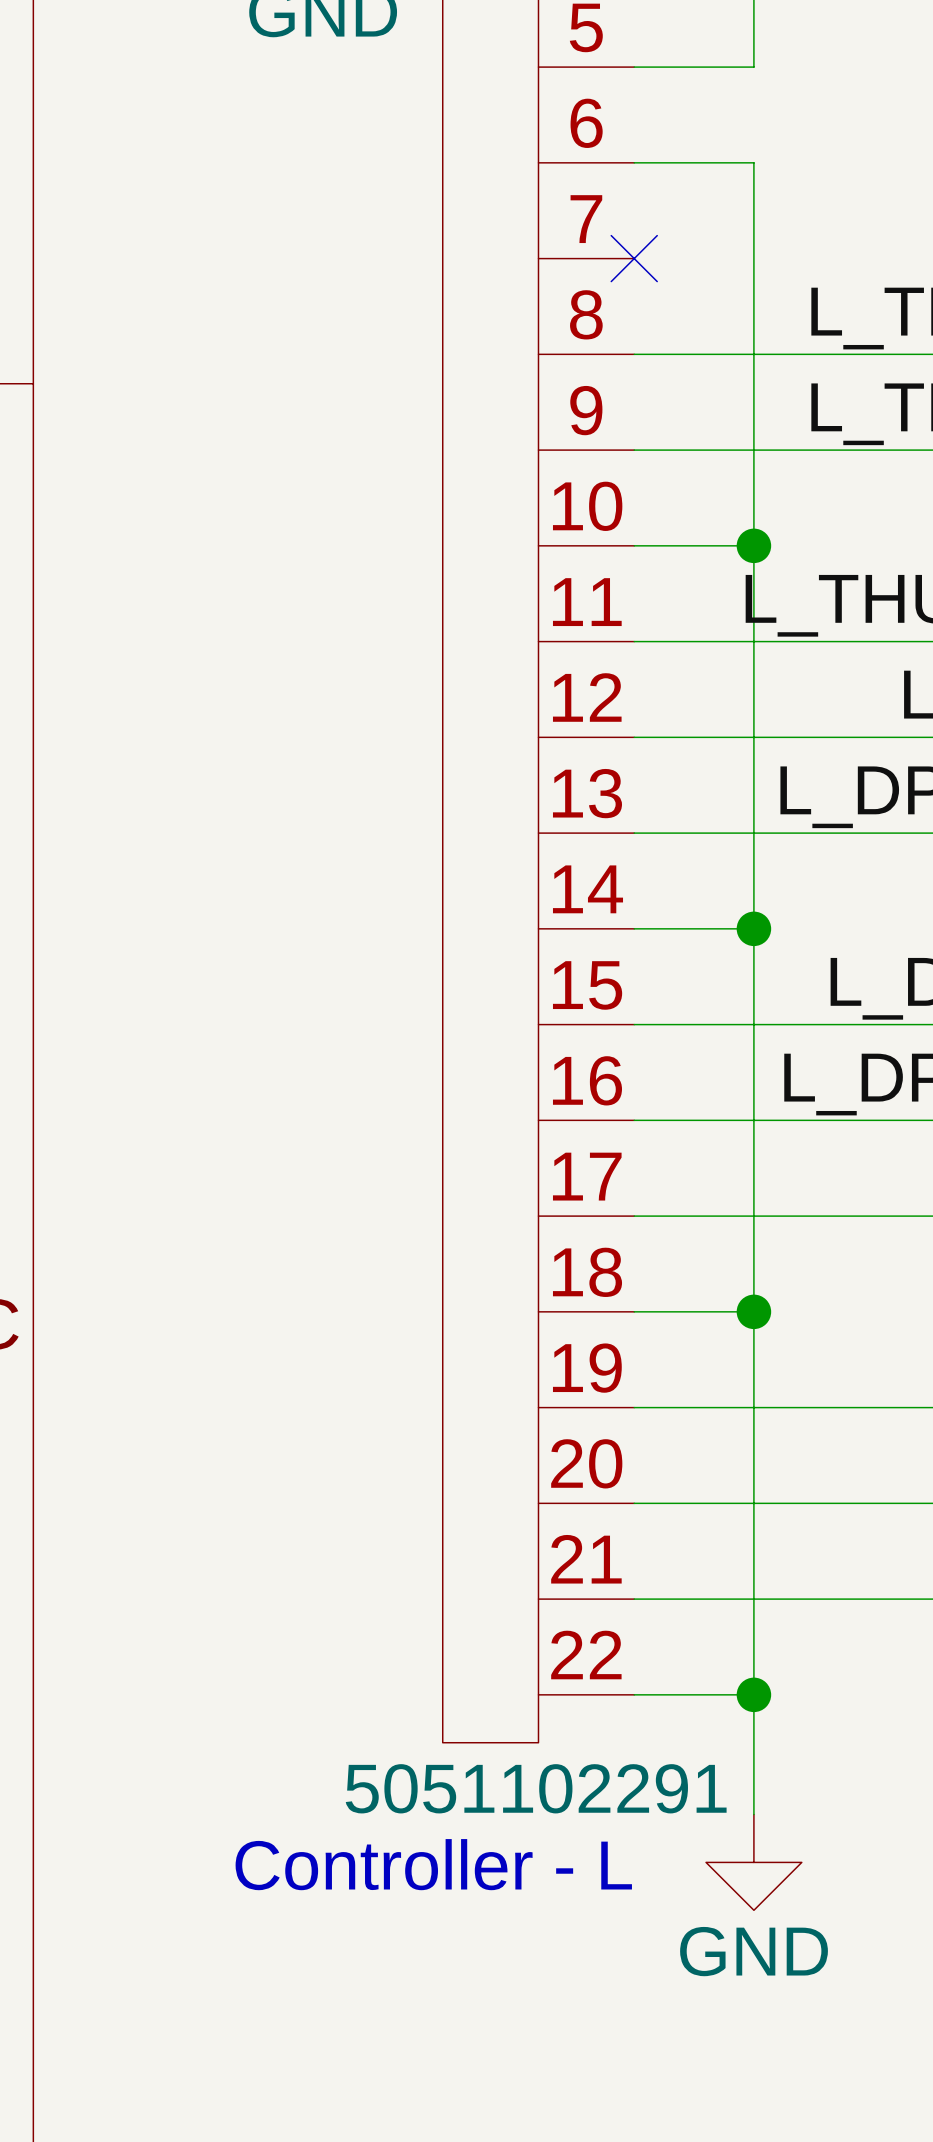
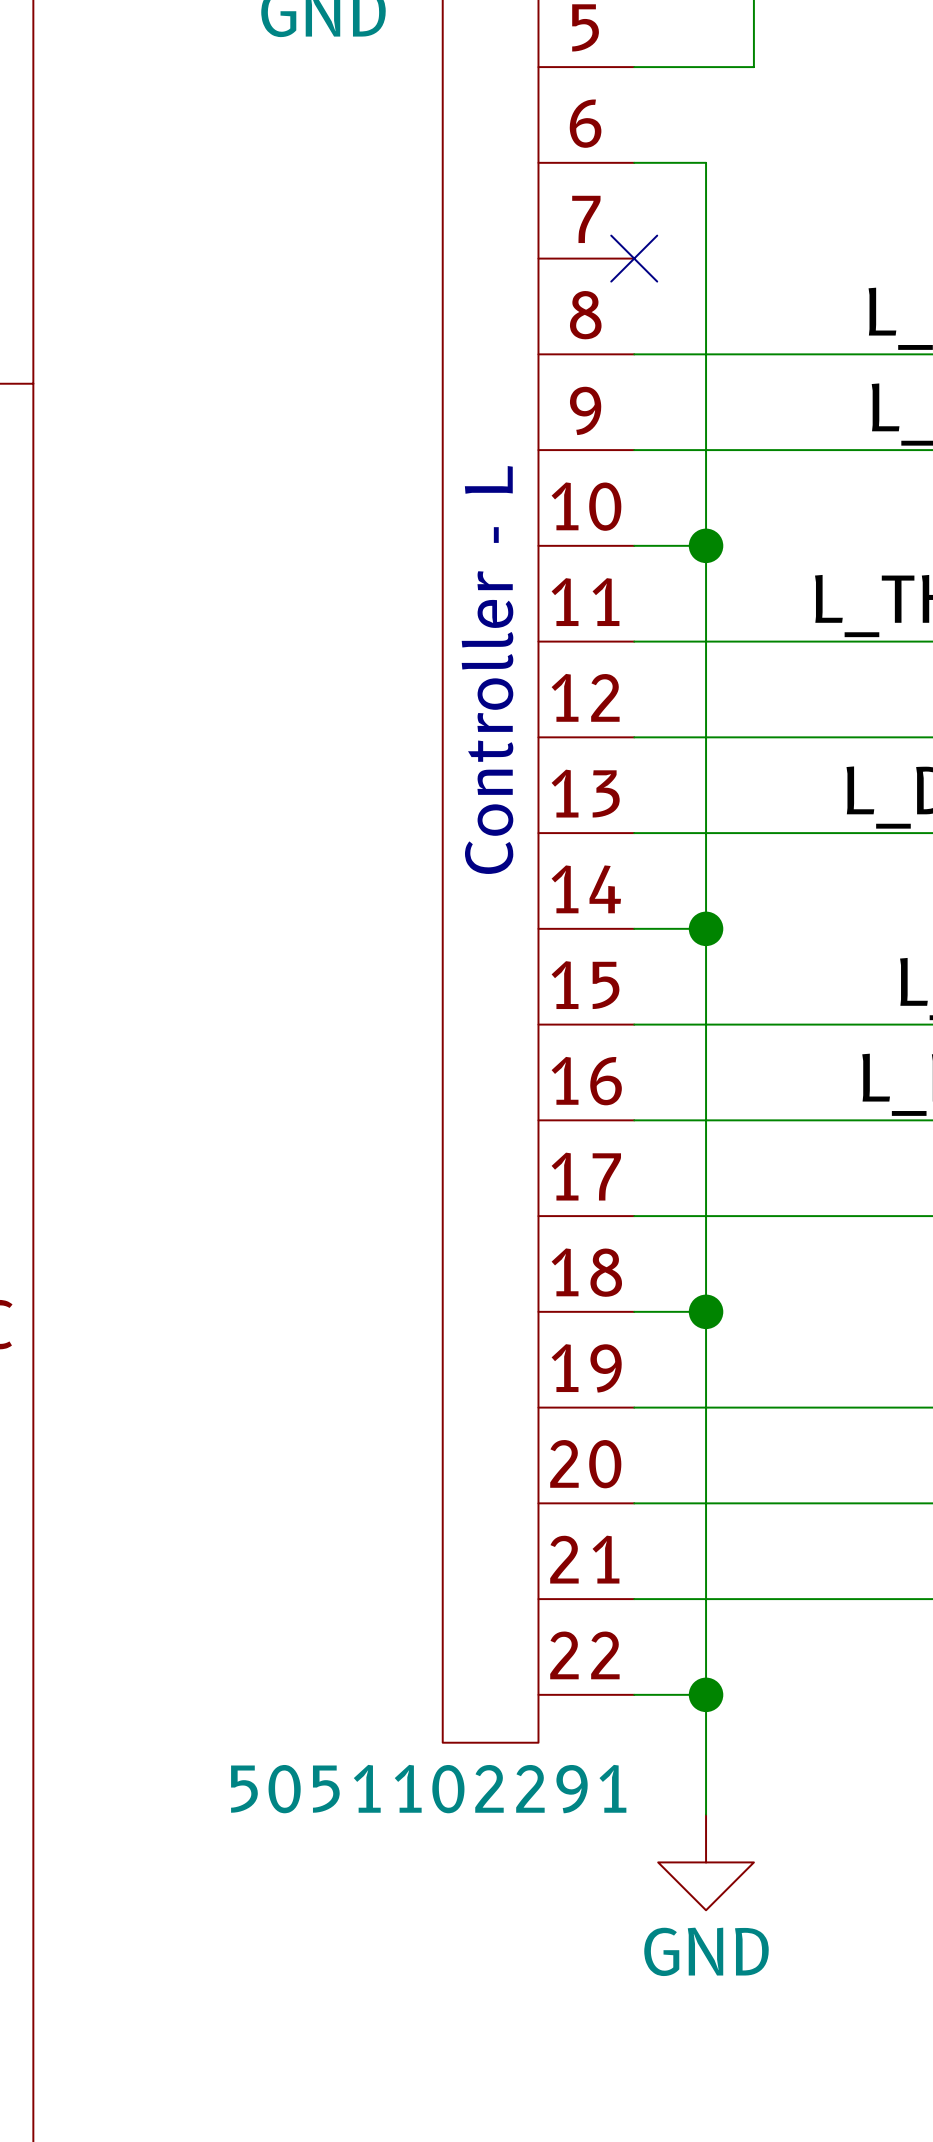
wire: (706, 162) (753, 162) (753, 1814) -> (706, 162) (706, 1814)
wire: (706, 545) (753, 545) -> none
junction position: (753, 545) -> (706, 545)
text: none -> Controller - L (487, 670)
wire: (706, 928) (753, 928) -> none
junction position: (753, 928) -> (706, 928)
wire: (706, 1311) (753, 1311) -> none
junction position: (753, 1311) -> (706, 1311)
wire: (706, 1694) (753, 1694) -> none
junction position: (753, 1694) -> (706, 1694)
part value position: 5051102291 (536, 1788) -> 5051102291 (428, 1789)
power symbol position: GND (753, 1862) -> GND (706, 1862)
text: Controller - L (433, 1864) -> none

